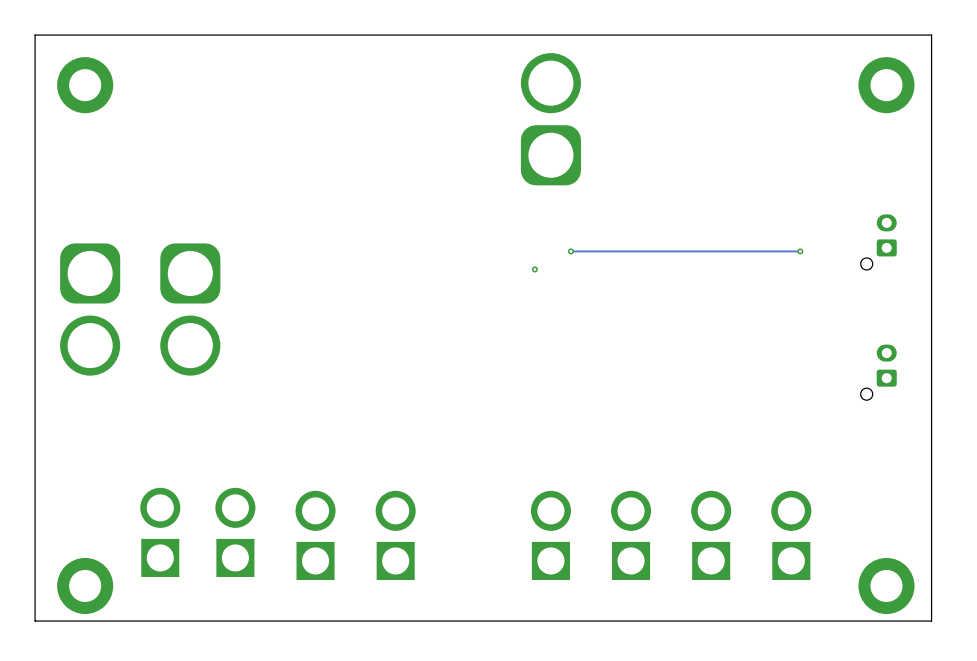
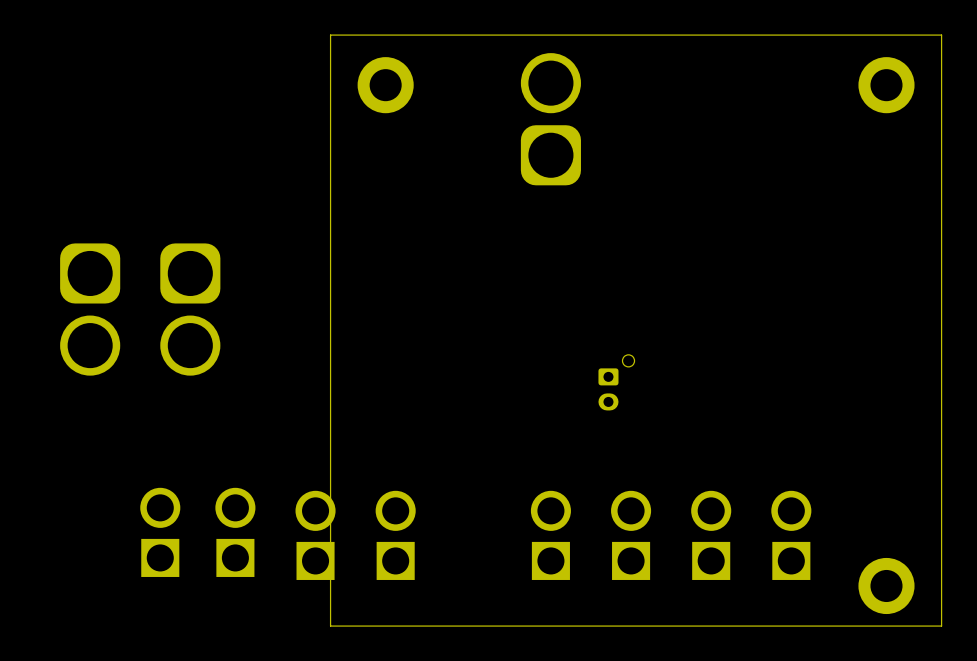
board edge: (931, 35) (931, 621) (35, 621) (35, 35) (330, 35) -> (931, 35) (941, 35) (941, 626) (330, 626) (330, 35)
part: (85, 85) -> none
part: none -> (385, 85)
part: (878, 242) -> none
via: (570, 251) -> none
track: (800, 251) (570, 251) -> none
via: (800, 251) -> none
via: (534, 269) -> none
part: (878, 372) -> none
part: none -> (616, 382)
part: (85, 585) -> none

